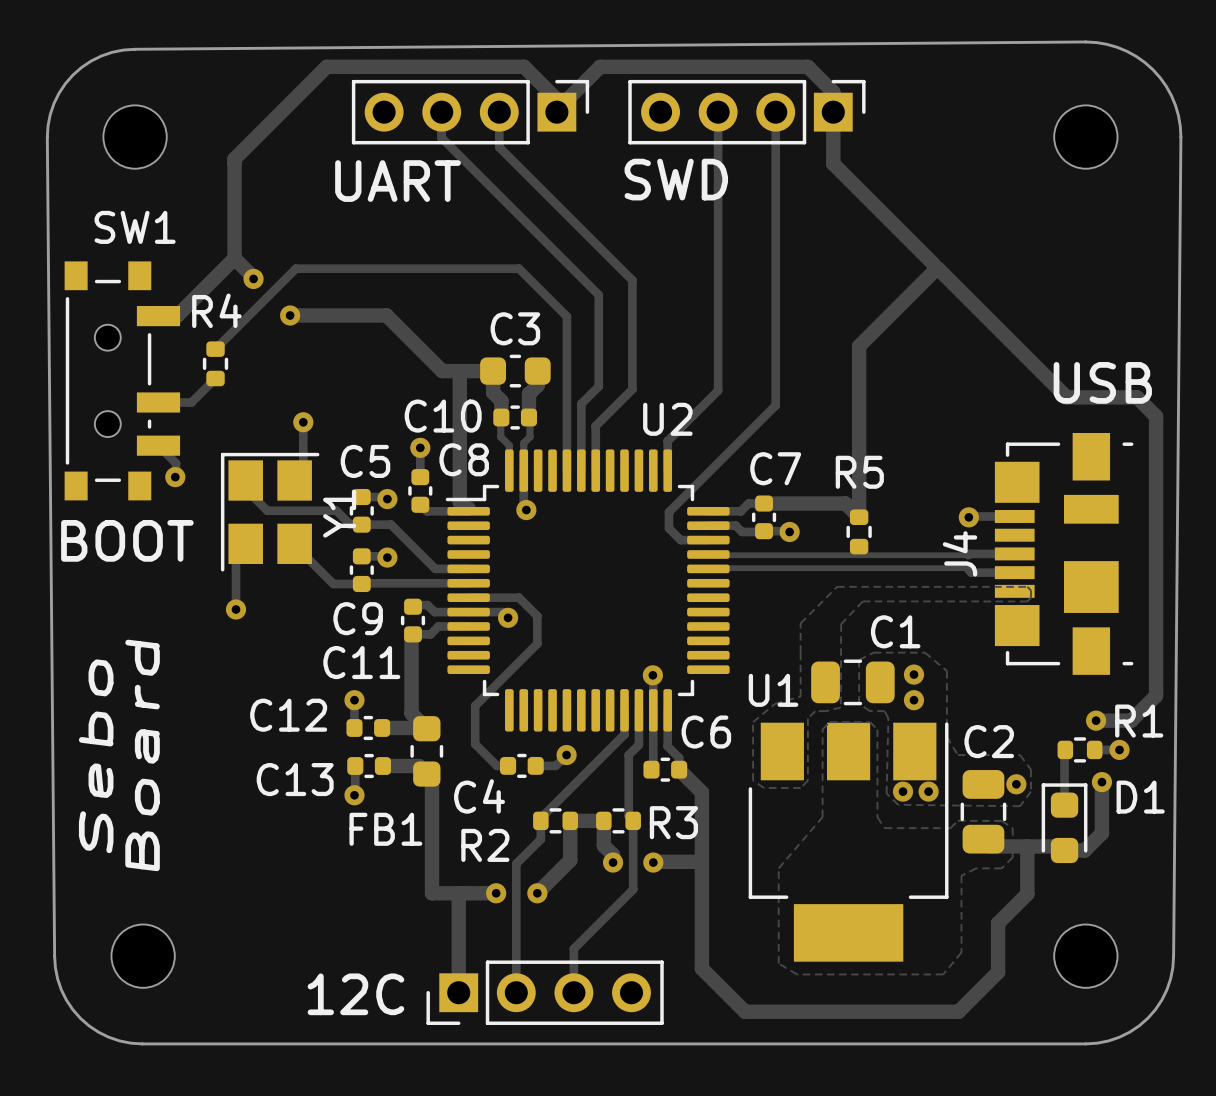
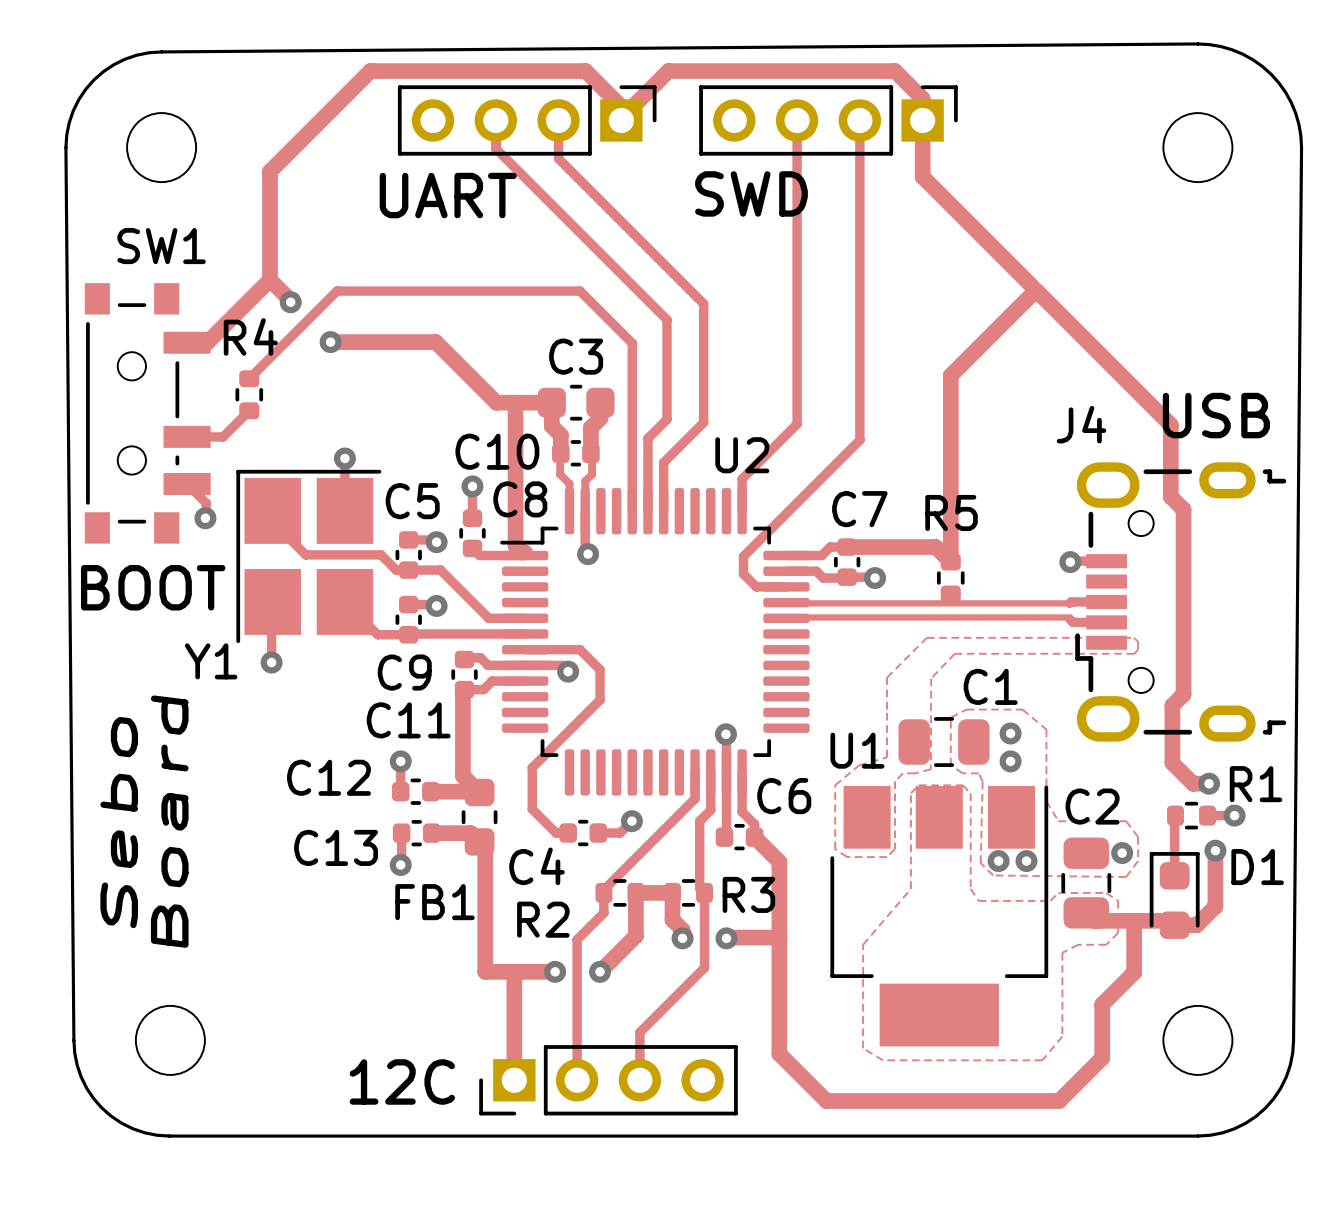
track: (1060, 391) (1066, 397) (1137, 397) (1156, 416) (1156, 695) (1131, 720) (1096, 720) -> (1170, 425) (1170, 496) (1183, 509) (1183, 694) (1172, 705) (1172, 762) (1193, 783) (1209, 783)
J4 footprint: [994, 432, 1134, 675] -> [1075, 462, 1287, 742]
Y1 footprint: [220, 452, 320, 572] -> [236, 469, 382, 644]
Y1 name rotation: 0° (339, 513) -> 90° clockwise (211, 661)
Y1 name position: Y1 (339, 513) -> Y1 (211, 661)
J4 name position: J4 (960, 553) -> J4 (1081, 424)

